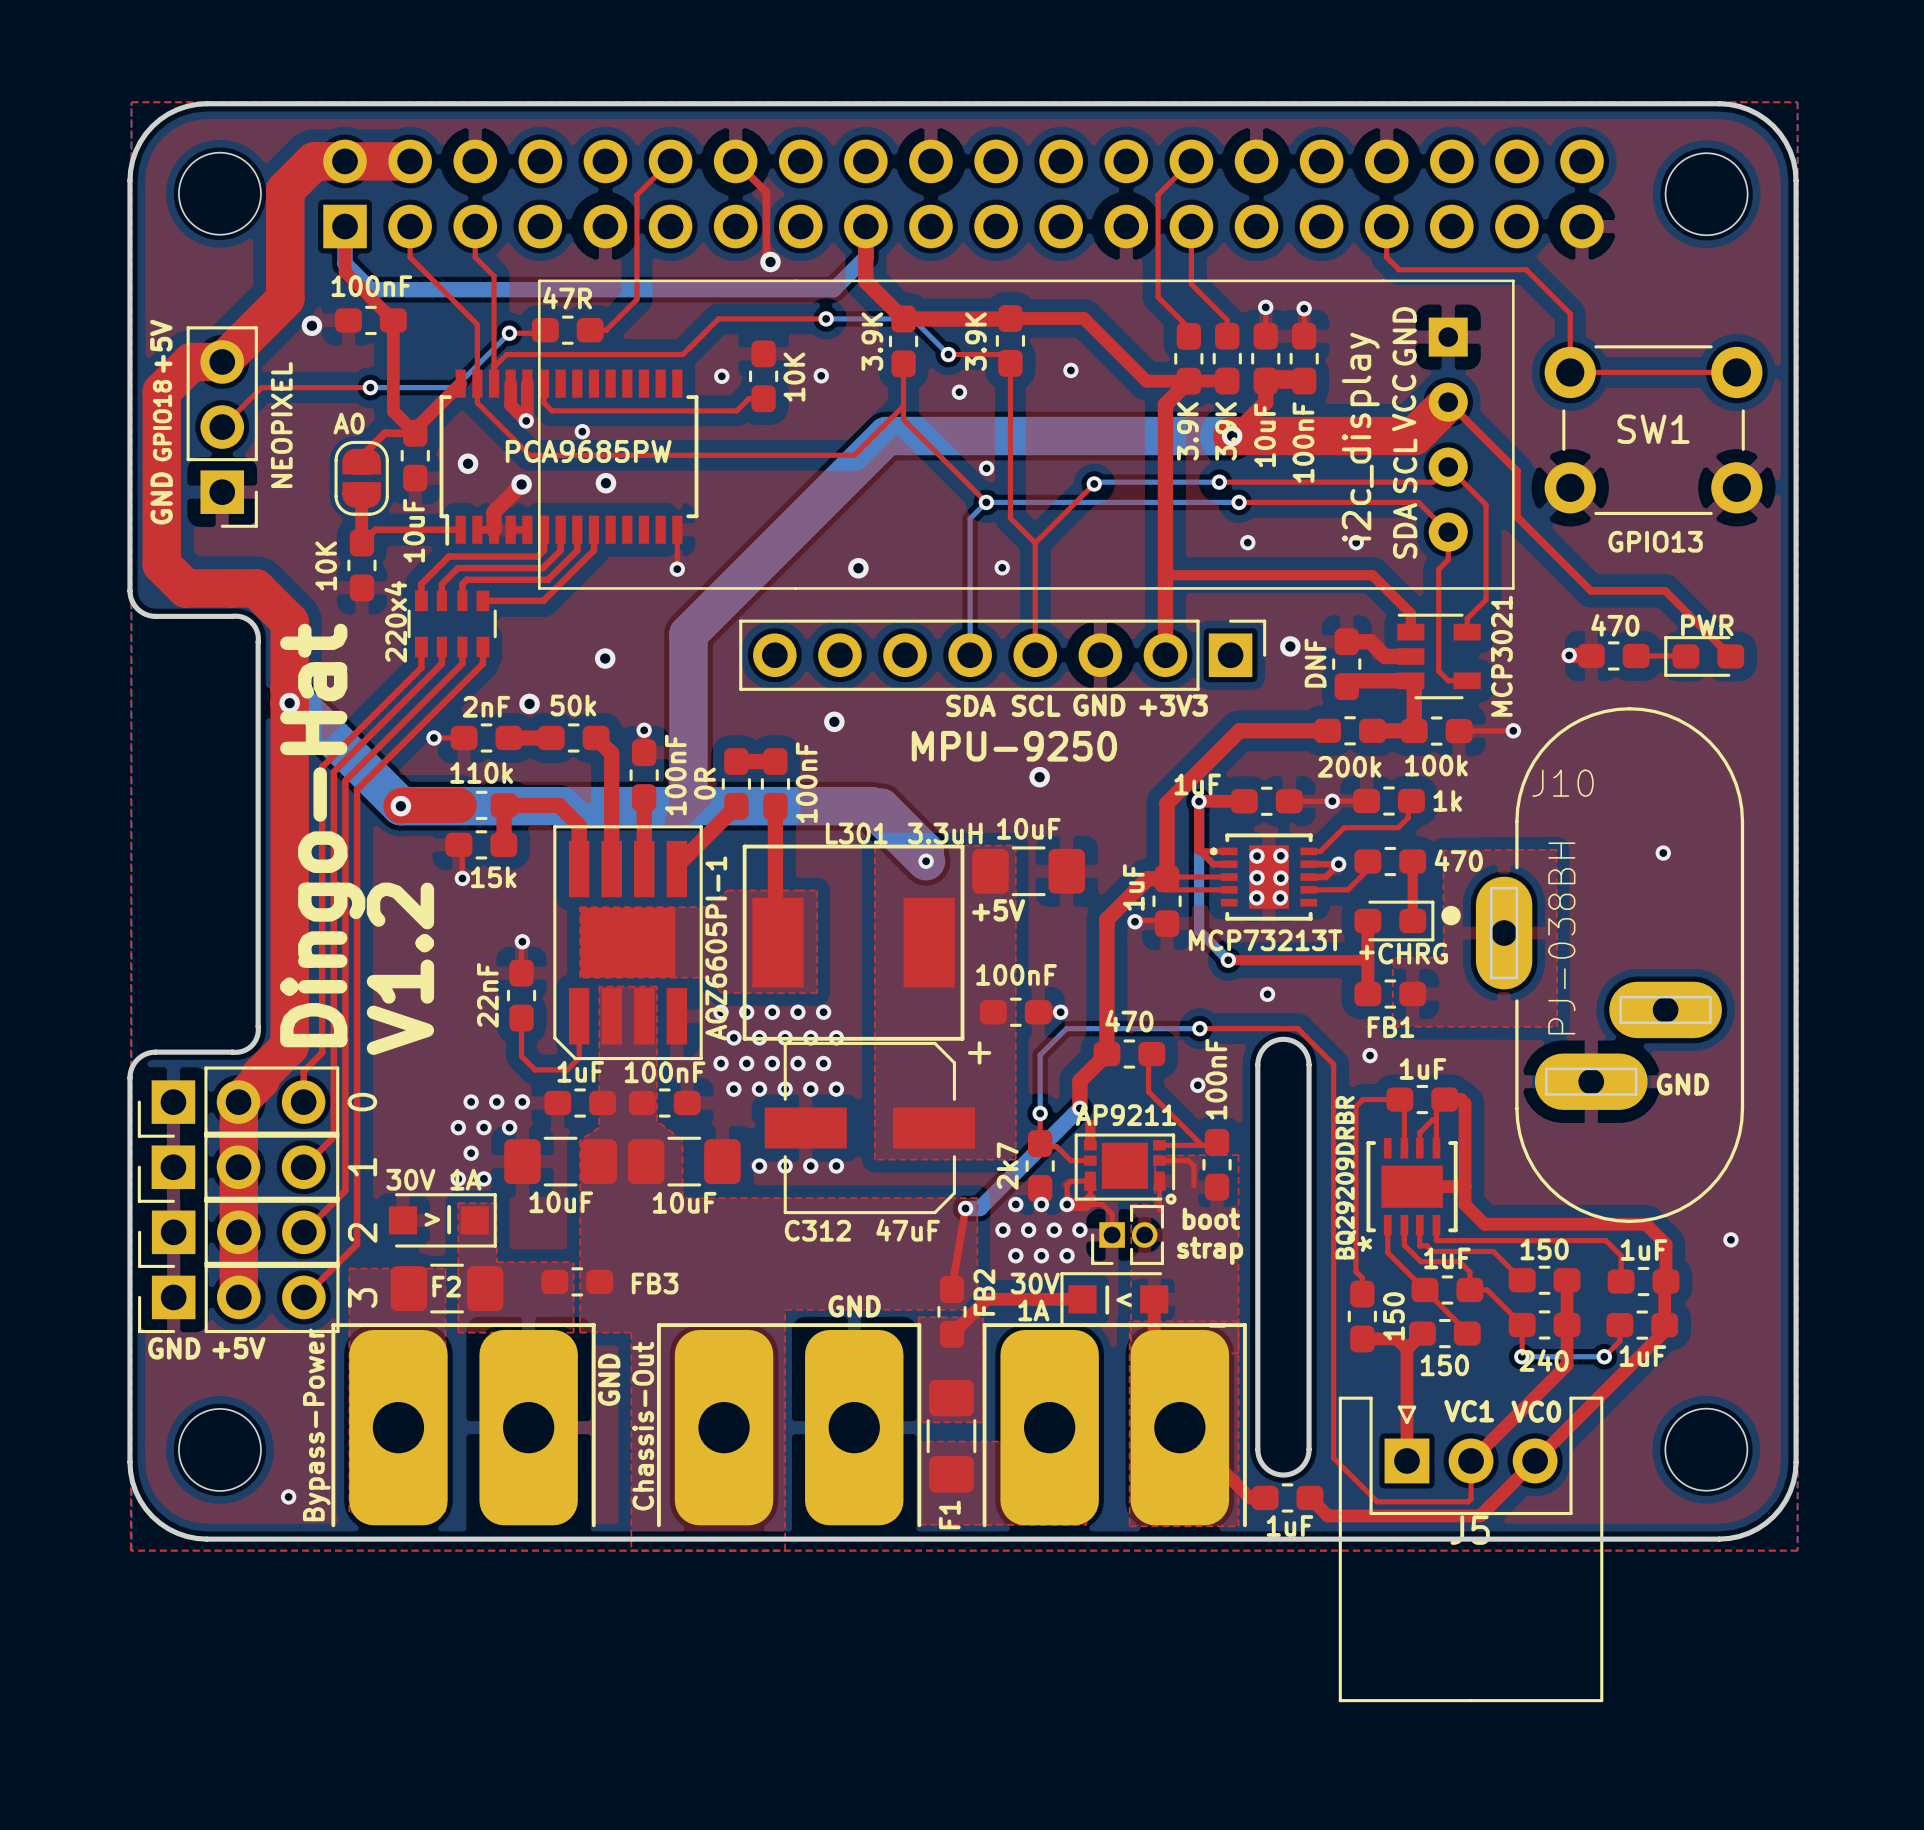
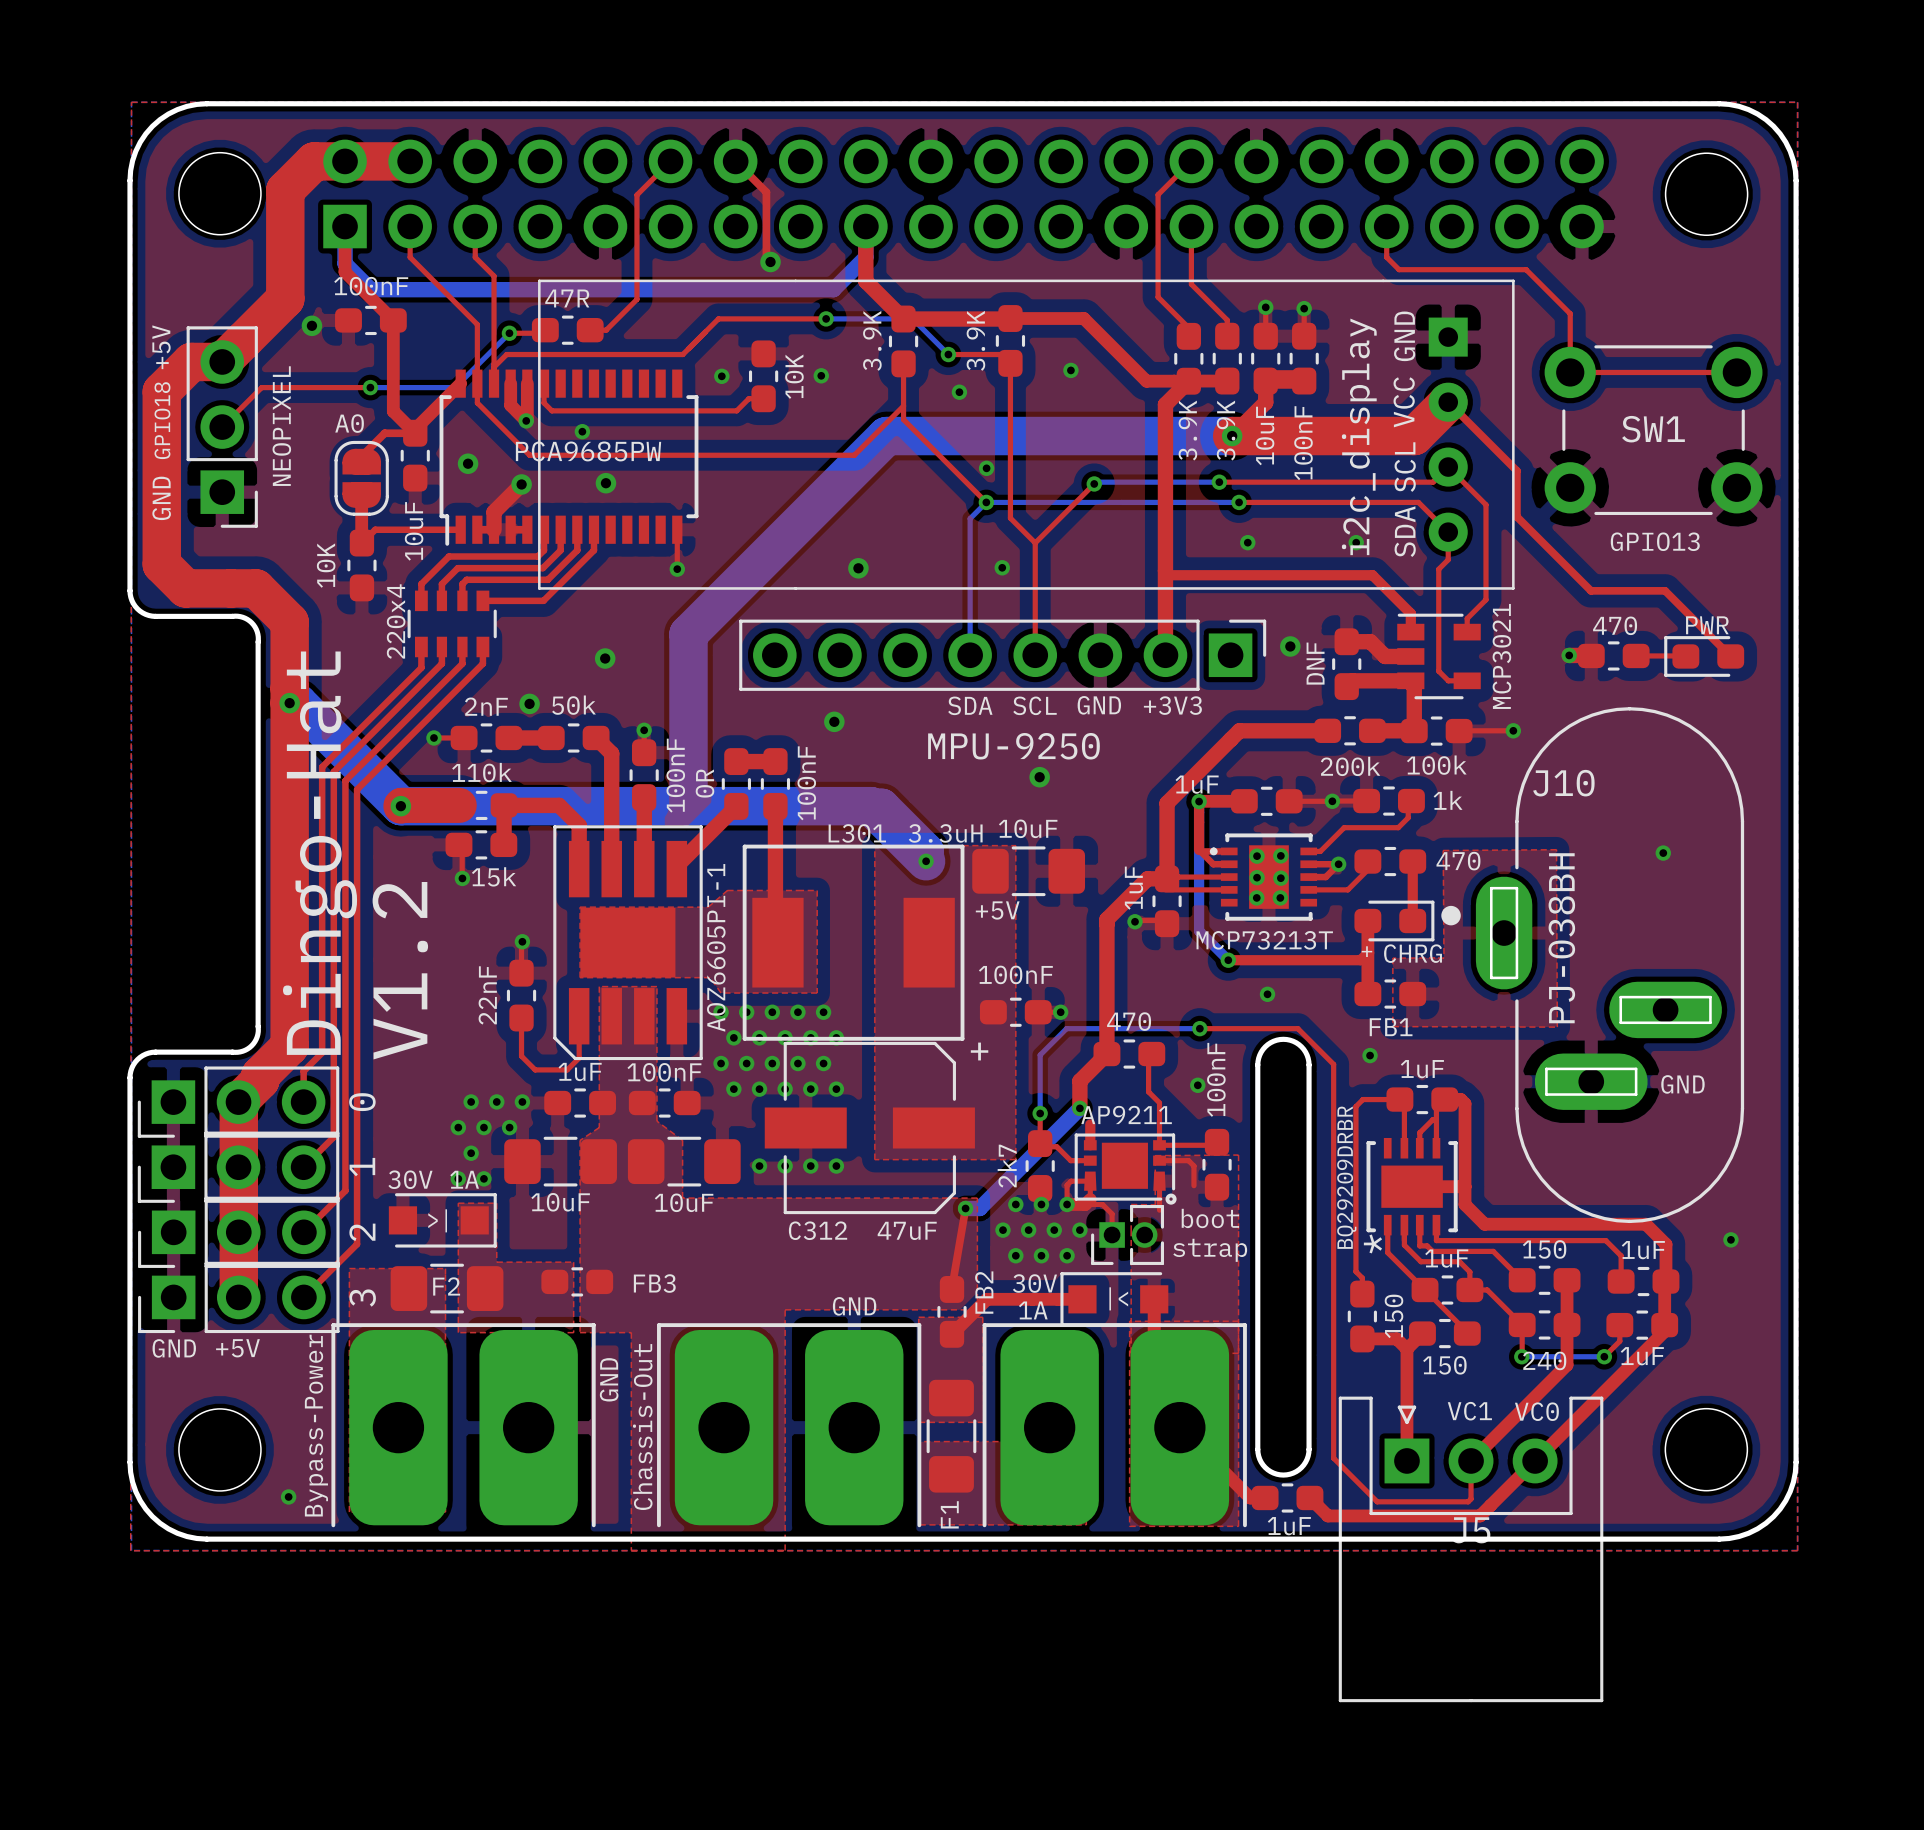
top track: (1159, 1102) (1202, 1145) (1217, 1145) -> (1159, 1102) (1159, 1145)

